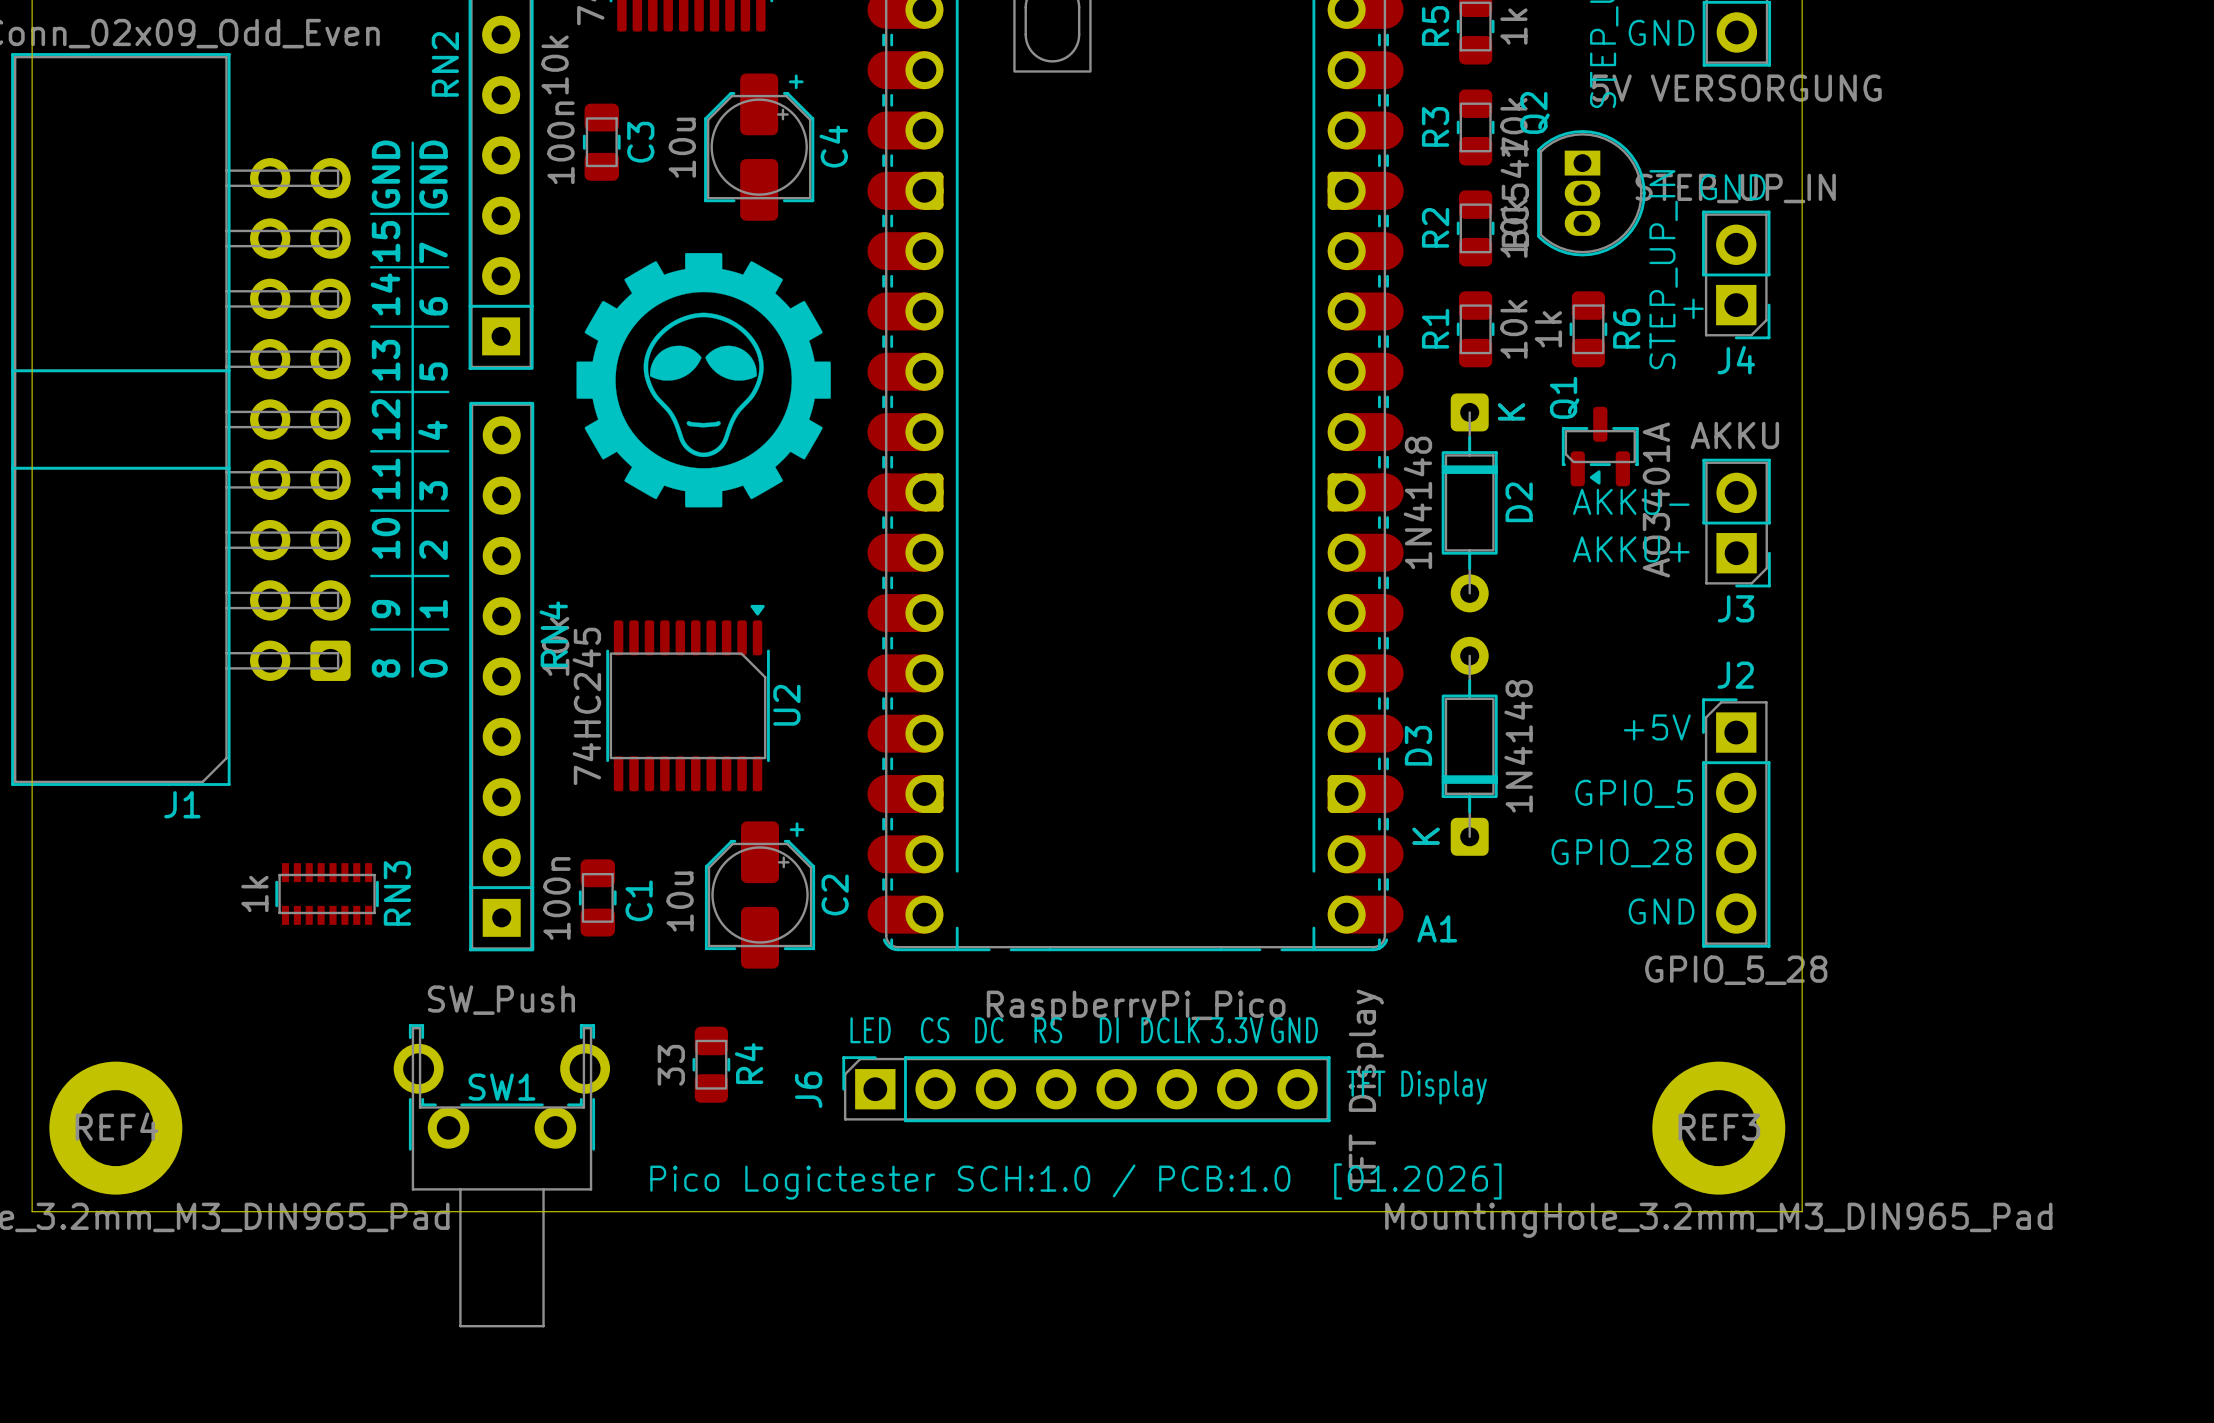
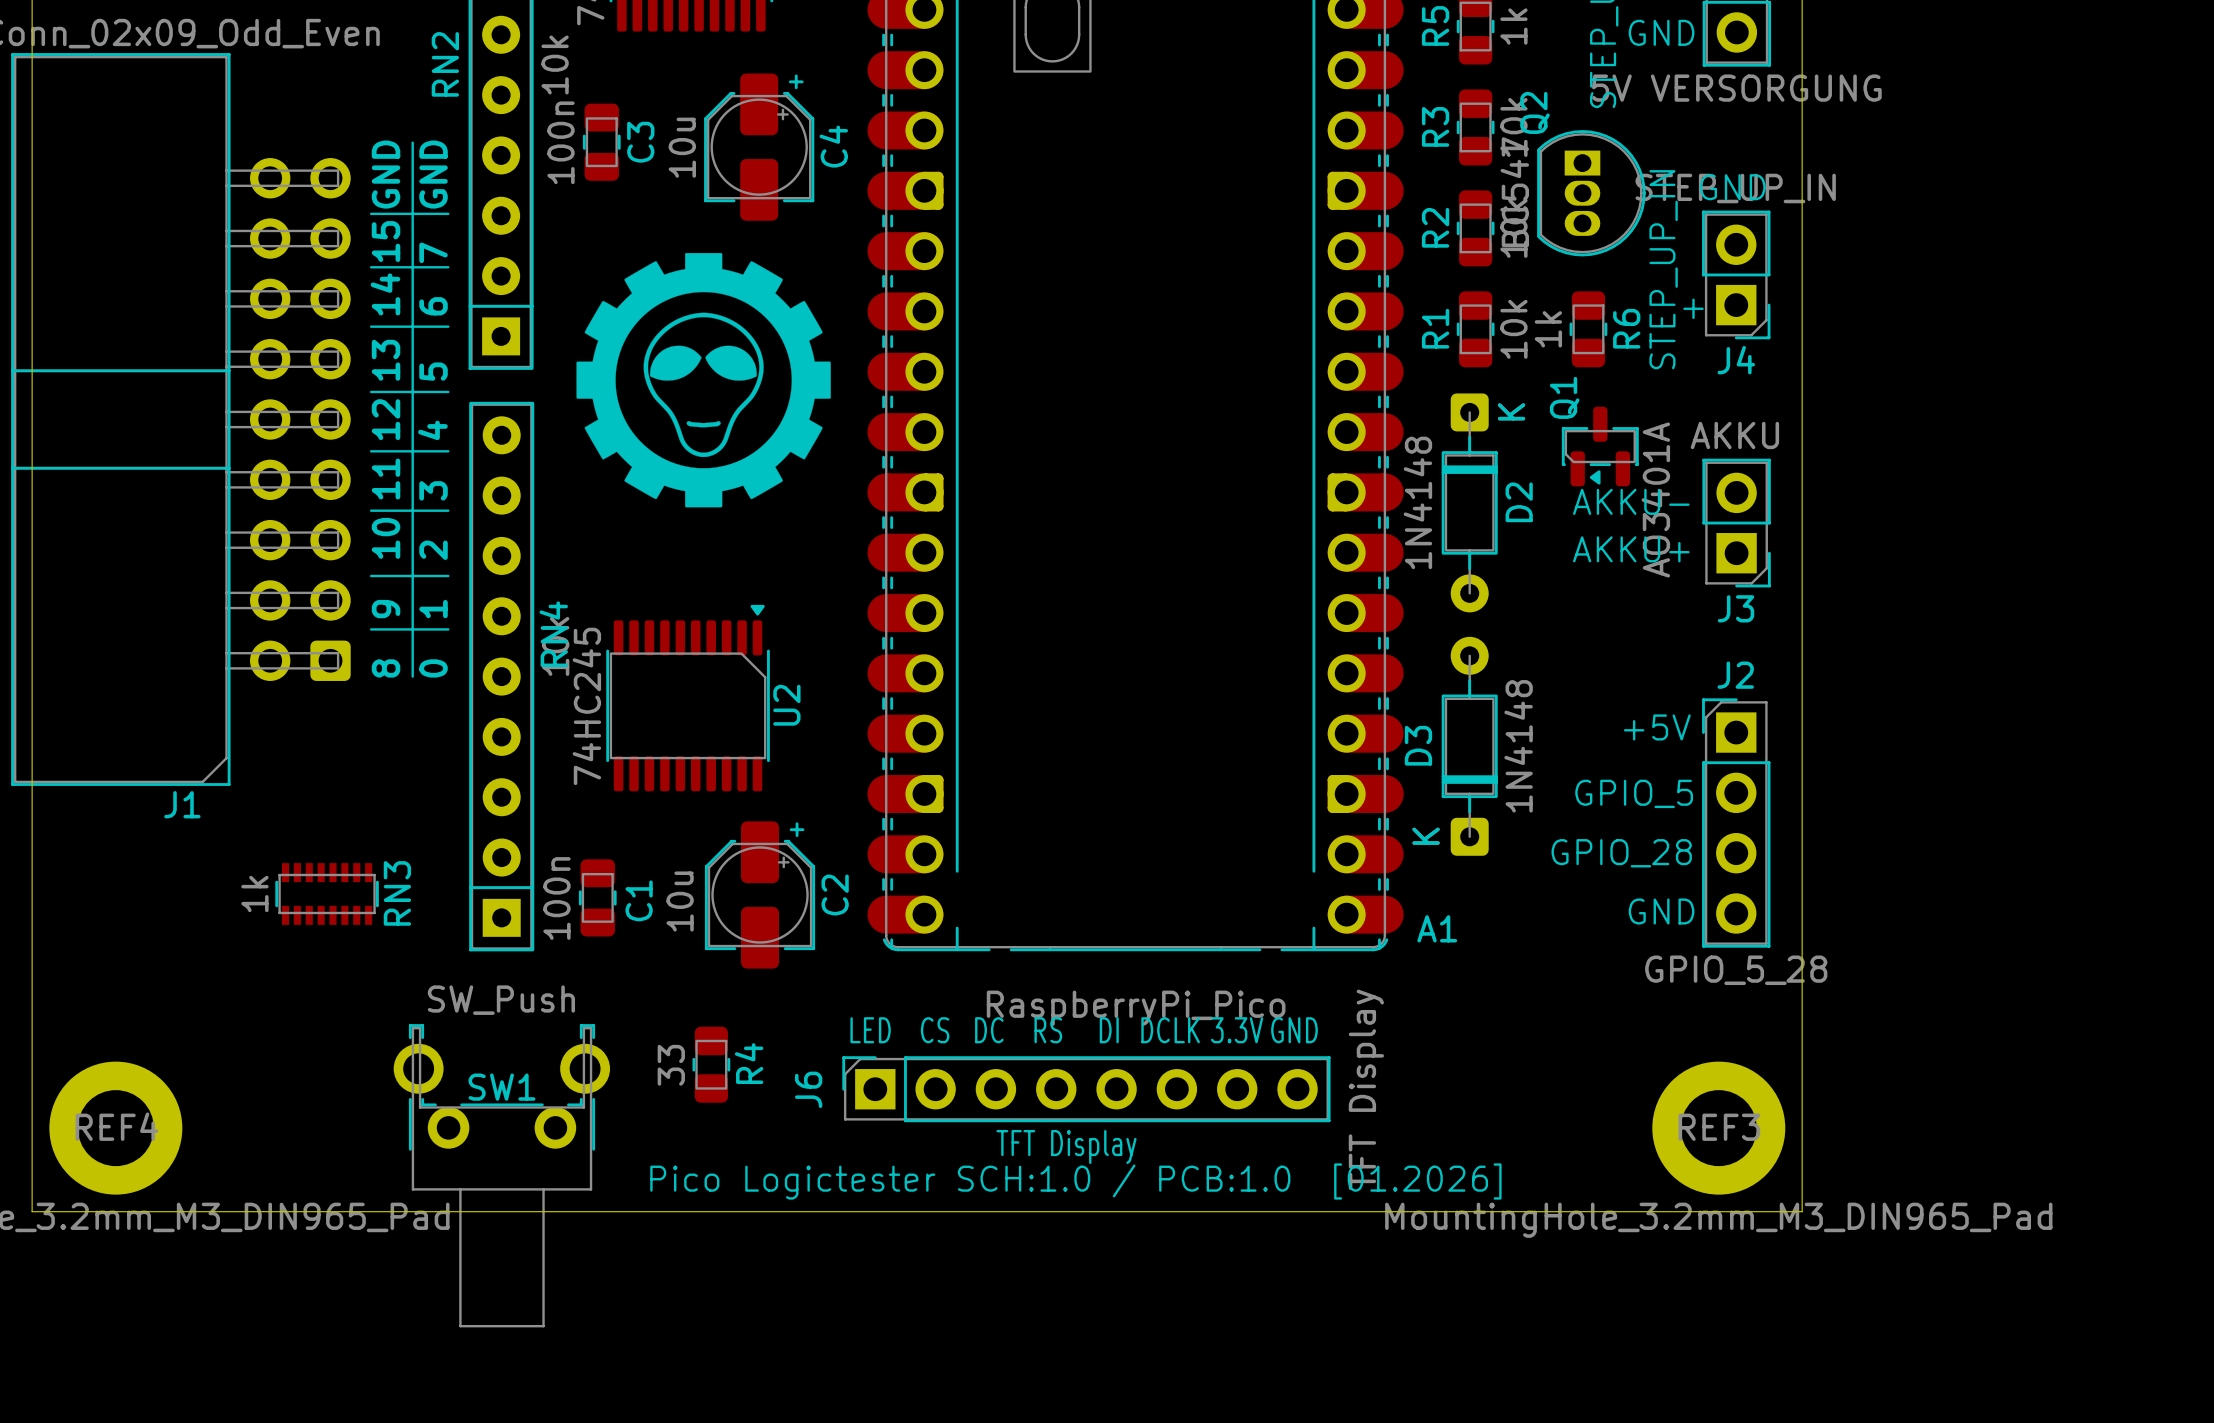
text position: TFT Display (1416, 1087) -> TFT Display (1066, 1146)

